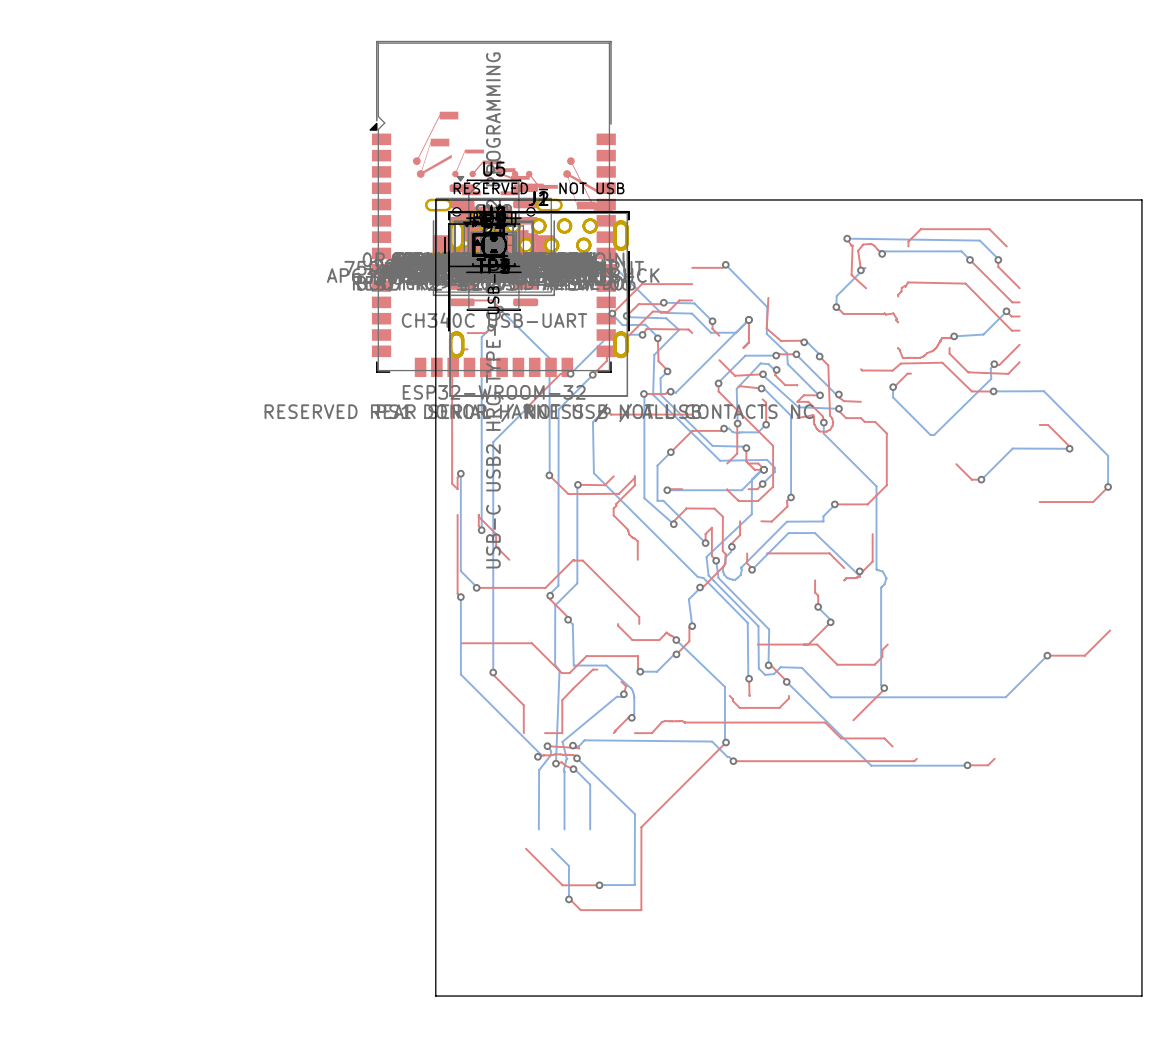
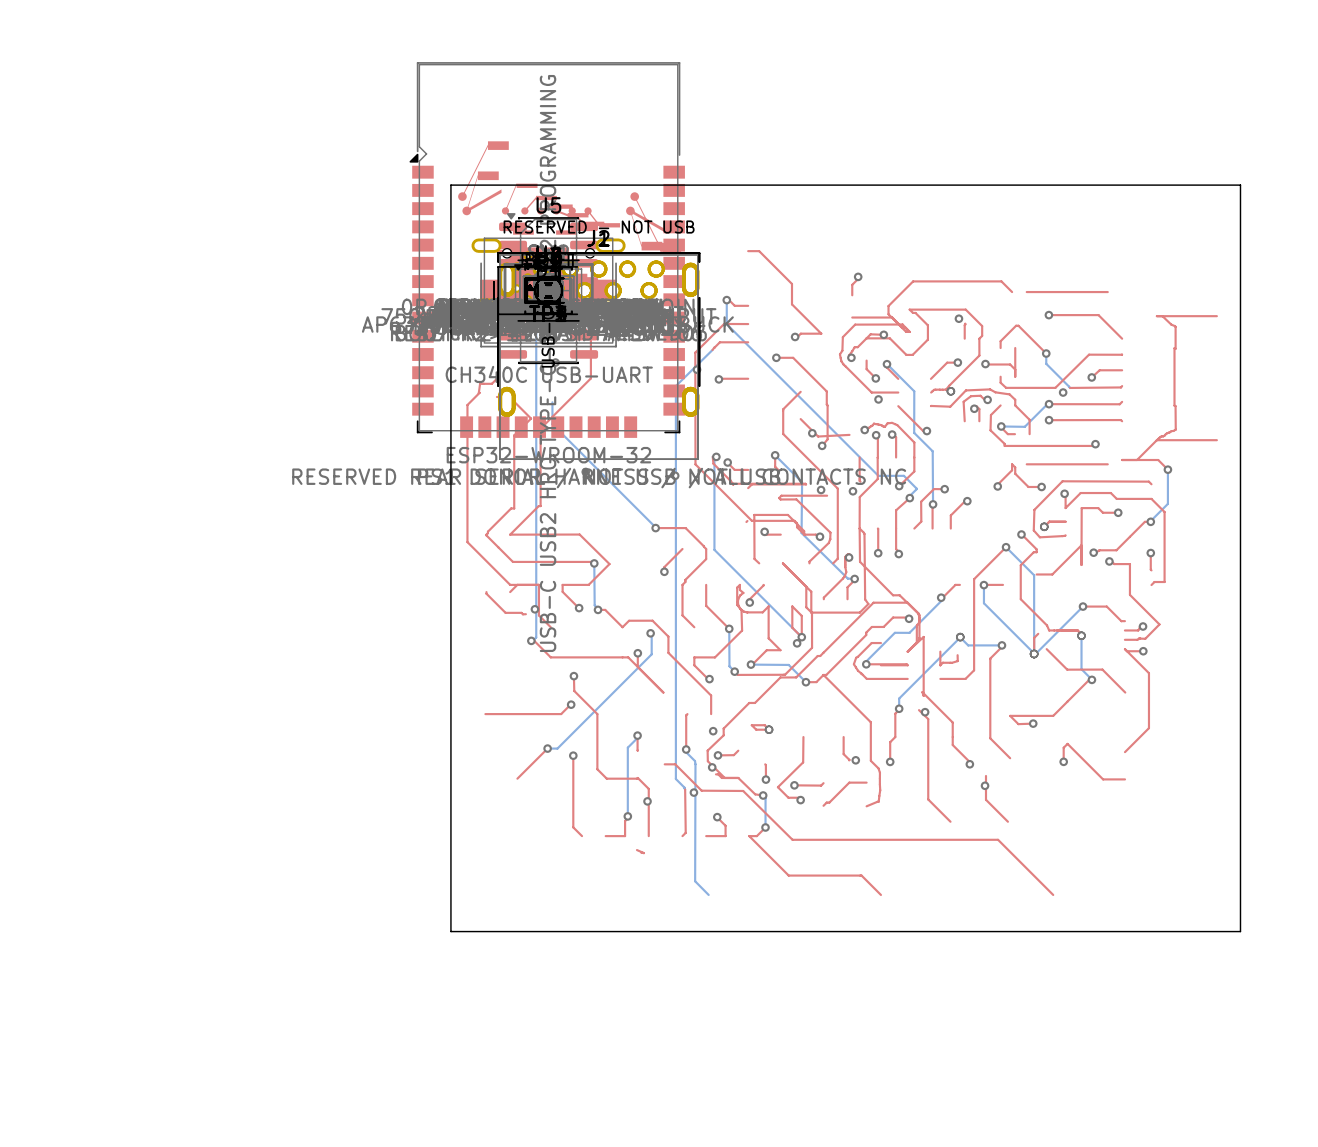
board edge: (435, 199) (1141, 199) (1141, 996) (435, 996) (435, 199) -> (450, 185) (450, 931) (1240, 931) (1240, 185) (450, 185)
top track: none -> (496, 251) (517, 251) (583, 316) (583, 326) (590, 334) (590, 378) (540, 428) (540, 506) (510, 534) (579, 534) (609, 564) (588, 584) (562, 584) (562, 591) (578, 607)
top track: none -> (748, 251) (759, 251) (792, 283) (792, 304) (821, 333) (800, 333) (795, 336)
top track: none -> (858, 276) (852, 284) (852, 295)
via: none -> (858, 276)
bottom track: none -> (520, 277) (536, 293) (536, 637) (531, 640)
top track: (847, 238) (852, 245) (851, 275) (866, 288) -> (965, 323) (964, 338)
bottom track: (847, 238) (979, 240) (998, 259) -> none
via: (847, 238) -> none
top track: (908, 246) (908, 241) (920, 229) (989, 229) (1006, 246) -> (1012, 292) (1001, 281) (913, 281) (888, 306) (888, 314) (906, 331) (909, 331)
top track: none -> (1026, 292) (1107, 292)
bottom track: (528, 253) (600, 253) (660, 312) (692, 313) (711, 332) (736, 332) (748, 319) -> none
top track: none -> (726, 300) (734, 305) (748, 305)
bottom track: none -> (726, 300) (726, 324) (878, 475) (903, 475) (916, 488) (909, 498)
via: none -> (726, 300)
top track: (882, 253) (871, 243) (863, 244) (858, 250) (860, 270) -> none
bottom track: (882, 253) (879, 251) (961, 251) (969, 259) -> none
via: (882, 253) -> none
top track: (969, 259) (1012, 302) (1019, 302) -> none
via: (969, 259) -> none
top track: (998, 259) (998, 266) (1019, 288) -> none
via: (998, 259) -> none
top track: (725, 264) (722, 267) (692, 267) -> none
bottom track: (725, 264) (767, 307) (766, 333) (787, 353) (787, 364) -> none
via: (725, 264) -> none
top track: none -> (1048, 315) (1098, 315) (1122, 338)
via: none -> (1048, 315)
top track: none -> (1156, 316) (1216, 316)
top track: none -> (1162, 316) (1175, 326) (1175, 429) (1156, 440)
top track: none -> (852, 317) (892, 317) (909, 331)
bottom track: (860, 270) (865, 268) (836, 296) (836, 307) -> none
top track: none -> (748, 324) (724, 323) (695, 352) (695, 464) (751, 520) (794, 520) (797, 527) (804, 534) (815, 534) (819, 538) (819, 536)
top track: none -> (909, 331) (902, 324) (855, 324) (842, 337) (842, 350) (839, 354) (843, 364) (871, 392) (898, 392)
top track: (692, 284) (641, 284) (613, 312) -> none
top track: none -> (883, 334) (870, 334) (857, 347) (854, 347) (849, 355) (851, 357)
via: none -> (883, 334)
via: none -> (795, 336)
top track: none -> (866, 338) (889, 338) (906, 354) (912, 354) (927, 339) (927, 325) (909, 309) (965, 309) (982, 326) (982, 335) (979, 338) (979, 355) (946, 389) (934, 389) (931, 392)
top track: none -> (748, 342) (719, 342) (714, 347)
top track: (898, 294) (901, 287) (905, 286) (907, 282) (965, 283) (1011, 330) (1019, 330) -> (1000, 346) (1000, 341) (1016, 325) (1018, 325) (1046, 353)
top track: none -> (714, 347) (712, 349)
top track: none -> (1015, 348) (1015, 376)
top track: (768, 297) (766, 328) (780, 340) (804, 342) -> none
bottom track: none -> (712, 349) (675, 386) (675, 779) (685, 789)
top track: (467, 300) (491, 300) (500, 309) -> none
top track: (692, 300) (679, 300) (668, 312) (652, 311) (606, 357) (606, 360) (592, 374) -> none
bottom track: none -> (1046, 353) (1046, 363) (1070, 387)
via: none -> (1046, 353)
top track: (663, 302) (638, 304) (626, 315) -> none
bottom track: (663, 302) (694, 303) (712, 321) -> none
via: (663, 302) -> none
top track: none -> (776, 357) (793, 357) (826, 391) (827, 439) (822, 445)
via: none -> (776, 357)
via: none -> (851, 357)
top track: none -> (866, 360) (866, 369) (875, 378)
top track: (836, 307) (843, 313) (893, 313) (898, 322) -> (1122, 354) (1089, 354) (1055, 387) (1006, 387) (1000, 382) (1000, 376)
via: (836, 307) -> none
bottom track: (500, 309) (549, 358) (549, 474) -> none
top track: none -> (957, 362) (947, 362) (930, 378)
via: none -> (957, 362)
top track: none -> (985, 364) (1010, 364) (1015, 369)
via: none -> (985, 364)
top track: none -> (886, 364) (886, 367) (898, 378)
bottom track: none -> (886, 364) (914, 391) (914, 432) (932, 451) (933, 504)
via: none -> (886, 364)
top track: (1006, 311) (1011, 316) (1019, 316) -> none
bottom track: (1006, 311) (983, 334) (954, 336) -> none
via: (1006, 311) -> none
bottom track: (612, 313) (622, 325) (645, 324) (656, 336) -> none
via: (612, 313) -> none
top track: none -> (1122, 370) (1099, 370) (1091, 377)
bottom track: (626, 317) (666, 318) (679, 329) (654, 354) (653, 394) (720, 460) (767, 459) (774, 467) (774, 471) (762, 484) -> none
top track: (748, 319) (748, 342) (743, 347) -> none
via: (748, 319) -> none
bottom track: (747, 320) (675, 392) (670, 391) -> none
top track: (712, 321) (712, 328) (719, 335) -> none
via: (712, 321) -> none
via: none -> (1091, 377)
via: none -> (875, 378)
top track: none -> (496, 378) (491, 383) (480, 383) (479, 392) (467, 405) (467, 542) (510, 584) (538, 584) (538, 615) (550, 627)
via: none -> (718, 379)
top track: none -> (748, 378) (718, 379)
top track: (490, 327) (485, 333) (467, 333) -> none
bottom track: (490, 327) (481, 337) (481, 530) -> none
via: (490, 327) -> none
top track: none -> (1122, 386) (1070, 387)
top track: (692, 333) (688, 329) (646, 329) (642, 334) -> none
bottom track: (642, 334) (609, 334) (570, 373) -> none
via: (642, 334) -> none
via: none -> (950, 391)
top track: (954, 336) (956, 338) (941, 338) -> none
top track: (657, 338) (658, 361) (667, 371) -> none
via: (657, 338) -> none
top track: (942, 338) (940, 341) -> none
top track: none -> (496, 396) (509, 396) (531, 418) (514, 435) (514, 508) (511, 508) (486, 535) (512, 561) (594, 563)
via: none -> (878, 399)
bottom track: (804, 342) (808, 342) (819, 356) -> none
via: (804, 342) -> none
top track: none -> (987, 399) (980, 395) (971, 396) (963, 401) (964, 421)
via: none -> (987, 399)
top track: (939, 342) (932, 351) (920, 357) (902, 358) (898, 347) -> (1095, 444) (1093, 445) (1004, 445) (990, 430) (990, 415) (1000, 405)
top track: none -> (1122, 401) (1119, 404) (1049, 404)
top track: (1019, 344) (999, 365) (994, 364) -> none
bottom track: none -> (552, 402) (552, 424) (655, 528)
bottom track: none -> (1049, 404) (1024, 426) (1001, 426)
via: none -> (1049, 404)
top track: (949, 347) (949, 353) (968, 372) (1008, 373) (1019, 362) -> none
top track: none -> (898, 406) (923, 431) (926, 431)
top track: none -> (930, 406) (950, 406) (965, 390) (990, 389) (995, 392) (1009, 394) (1015, 399) (1015, 405) (1029, 419) (1029, 434)
top track: (467, 349) (460, 349) (452, 353) (451, 365) (452, 483) (457, 489) (457, 477) (460, 473) -> none
top track: none -> (974, 408) (976, 406) (979, 409) (979, 421)
via: none -> (974, 408)
top track: (796, 354) (776, 355) -> none
bottom track: (796, 354) (839, 397) (838, 394) -> none
via: (796, 354) -> none
bottom track: (776, 355) (745, 355) (718, 383) -> none
via: (776, 355) -> none
top track: (819, 356) (828, 365) (830, 415) (833, 422) (832, 425) (826, 431) (819, 431) (814, 424) (813, 415) (797, 418) -> none
via: (819, 356) -> none
top track: none -> (1049, 420) (1122, 421)
via: none -> (1049, 420)
bottom track: (787, 364) (820, 395) -> none
bottom track: (994, 364) (990, 368) (991, 378) (934, 435) (930, 435) (893, 397) (893, 387) -> none
via: (994, 364) -> none
via: none -> (1001, 426)
top track: none -> (861, 428) (868, 428) (873, 423) (884, 426) (887, 423) (892, 422) (897, 425) (914, 442) (914, 471) (899, 486)
top track: (776, 369) (775, 375) (785, 385) (797, 385) -> none
bottom track: (776, 369) (768, 364) (760, 363) (736, 388) (737, 423) -> none
top track: (860, 369) (892, 370) (900, 363) (942, 362) (971, 391) (993, 391) -> none
via: none -> (926, 431)
bottom track: (667, 371) (660, 378) (660, 394) (712, 445) (746, 448) -> none
via: (667, 371) -> none
via: none -> (812, 433)
top track: (570, 373) (560, 373) (527, 407) -> none
via: (570, 373) -> none
top track: none -> (892, 433) (896, 437) (896, 457)
top track: (907, 373) (893, 387) -> (1011, 434) (1007, 434) (1002, 429)
bottom track: (592, 374) (558, 409) (558, 585) (550, 595) -> none
via: (592, 374) -> none
bottom track: (763, 374) (798, 407) (838, 408) -> none
via: (763, 374) -> none
top track: none -> (876, 435) (876, 433) (877, 457)
via: none -> (876, 435)
via: none -> (892, 434)
top track: none -> (1156, 440) (1216, 440)
top track: none -> (1156, 440) (1137, 460)
via: none -> (1095, 444)
top track: (718, 383) (718, 391) (773, 445) (773, 486) (758, 500) (738, 501) (727, 489) -> (827, 495) (781, 495) (779, 498) (796, 499) (830, 532) (828, 542) (809, 563)
via: (718, 383) -> none
via: none -> (822, 445)
top track: (738, 387) (761, 388) -> none
via: (893, 387) -> none
bottom track: (761, 388) (761, 386) (791, 415) (791, 497) -> none
via: (761, 388) -> none
top track: (670, 391) (665, 393) (643, 393) -> none
via: (670, 391) -> none
bottom track: (993, 391) (1043, 391) (1108, 455) (1108, 487) -> none
via: (993, 391) -> none
top track: none -> (775, 455) (775, 466) (779, 470)
bottom track: none -> (775, 455) (802, 482) (801, 533) (847, 578) (854, 578)
via: none -> (775, 455)
top track: none -> (712, 456) (713, 463) (733, 484) (733, 483) (806, 484) (751, 484) (748, 488)
bottom track: none -> (712, 456) (714, 458) (714, 549) (801, 637)
bottom track: (643, 393) (644, 498) (673, 524) -> none
top track: none -> (859, 457) (860, 481)
top track: none -> (877, 457) (877, 479) (859, 497) (859, 528)
top track: (838, 394) (839, 398) (844, 401) (860, 401) -> none
via: (838, 394) -> none
top track: (820, 395) (803, 395) (797, 401) (808, 401) (823, 416) (823, 424) (823, 422) -> none
via: (820, 395) -> none
top track: none -> (1122, 460) (1158, 460) (1167, 469)
top track: none -> (727, 462) (734, 469) (748, 469)
via: none -> (727, 462)
top track: (762, 399) (766, 402) (766, 424) -> none
top track: none -> (1026, 464) (1107, 464)
bottom track: none -> (1167, 469) (1167, 503) (1150, 521)
via: none -> (1167, 469)
bottom track: (527, 407) (493, 442) (493, 672) -> none
top track: (838, 408) (846, 418) (860, 418) (864, 421) (875, 421) (886, 433) (886, 485) (867, 504) (834, 504) -> none
via: (838, 408) -> none
top track: (607, 410) (611, 414) (692, 414) -> none
bottom track: (607, 410) (604, 410) (592, 422) (593, 473) (697, 576) (703, 578) (747, 622) (749, 678) -> none
via: none -> (899, 486)
top track: none -> (997, 486) (1012, 470) (1012, 464) (1015, 467) (1015, 473) (1028, 486) (1041, 486)
via: none -> (997, 486)
via: none -> (1041, 486)
bottom track: (823, 422) (823, 433) (876, 486) (876, 569) (882, 571) (886, 578) (882, 586) -> none
via: (823, 422) -> none
top track: none -> (944, 489) (933, 489) (921, 501) (921, 521) (914, 528)
via: none -> (944, 489)
top track: (737, 423) (737, 453) (727, 463) -> none
bottom track: (766, 424) (758, 432) (736, 432) (729, 428) (724, 428) -> none
top track: (1039, 425) (1048, 425) (1069, 446) (1069, 448) -> none
top track: none -> (1064, 493) (1065, 508) (1080, 493) (1110, 493) (1116, 498) (1151, 498) (1164, 512) (1164, 582) (1154, 582) (1151, 585)
via: none -> (1064, 493)
top track: (724, 428) (720, 430) (692, 430) (671, 451) -> none
via: (724, 428) -> none
top track: none -> (909, 498) (896, 510) (896, 549) (898, 554)
via: none -> (909, 498)
top track: none -> (967, 501) (950, 515) (950, 528)
via: none -> (967, 501)
top track: none -> (933, 504) (932, 528)
via: none -> (933, 504)
top track: none -> (1118, 512) (1102, 512) (1098, 508) (1081, 508) (1081, 564) (1081, 545) (1052, 574) (1036, 574)
via: none -> (1118, 512)
top track: (746, 448) (746, 461) (754, 469) (763, 469) (758, 463) (748, 463) -> none
via: (746, 448) -> none
bottom track: (1069, 448) (1012, 448) (982, 478) -> none
via: (1069, 448) -> none
top track: none -> (1065, 521) (1049, 521) (1044, 526)
bottom track: (670, 452) (657, 465) (657, 500) (663, 500) (705, 543) -> none
via: (670, 452) -> none
top track: none -> (1150, 521) (1144, 521) (1116, 550) (1099, 550) (1096, 552)
via: none -> (1150, 521)
via: none -> (1044, 526)
top track: none -> (655, 528) (685, 528) (706, 549)
via: none -> (655, 528)
top track: none -> (859, 528) (864, 533) (865, 599) (868, 604) (859, 612) (811, 612) (811, 591) (782, 563)
top track: none -> (859, 528) (860, 561) (893, 595) (899, 595) (919, 615) (919, 639) (907, 651) (923, 636) (923, 695) (922, 692) (952, 722) (952, 745) (971, 763) (969, 764)
top track: none -> (877, 528) (878, 553)
top track: none -> (764, 532) (766, 534) (780, 534)
via: none -> (764, 531)
top track: none -> (1021, 534) (1036, 549) (1036, 552) (1033, 552) (1020, 565) (1020, 599) (1047, 625) (1049, 630) (1077, 630) (1080, 634)
via: none -> (1021, 534)
top track: (956, 464) (971, 479) (981, 479) -> (1065, 535) (1039, 537) (1033, 530) (1034, 509) (1062, 481) (1148, 481) (1151, 484)
via: none -> (819, 536)
via: (763, 469) -> none
bottom track: (460, 473) (460, 571) (476, 587) -> none
via: (460, 473) -> none
top track: none -> (1006, 547) (974, 579) (974, 670) (965, 678) (940, 678)
bottom track: none -> (1006, 547) (1034, 575) (1034, 653)
via: none -> (1006, 547)
top track: (549, 475) (568, 494) (618, 493) (634, 477) -> none
via position: (549, 475) -> (594, 563)
top track: none -> (1150, 553) (1151, 570)
via: none -> (1150, 553)
via: none -> (878, 553)
via: none -> (898, 554)
top track: (577, 484) (604, 485) -> (664, 571) (664, 567) (672, 558)
bottom track: (577, 484) (577, 583) (555, 605) (555, 664) (559, 670) (555, 763) -> none
via: (577, 484) -> none
top track: (762, 484) (762, 482) (757, 489) (748, 489) -> (800, 391) (783, 409) (783, 434) (837, 488) (837, 558) (833, 563)
top track: none -> (1110, 559) (1114, 564) (1129, 564) (1129, 594) (1159, 624) (1145, 638) (1124, 639)
via: none -> (1109, 561)
top track: (1108, 487) (1093, 502) (1039, 502) -> none
via: (1108, 487) -> none
bottom track: none -> (594, 563) (594, 605) (598, 609)
top track: (682, 489) (667, 490) -> (759, 563) (754, 558) (754, 514) (787, 514) (804, 531) (804, 534)
bottom track: (667, 490) (741, 490) (763, 468) (763, 469) (761, 469) (751, 479) (751, 514) (706, 556) (708, 575) (758, 626) (758, 668) (765, 674) (773, 674) (780, 667) (801, 667) (830, 697) (1005, 697) (1046, 656) -> none
via: (667, 490) -> none
via: none -> (664, 571)
top track: (791, 497) (786, 501) (787, 506) (771, 521) (761, 521) -> (854, 578) (847, 587) (847, 599)
via: (791, 497) -> none
via: none -> (854, 578)
bottom track: (834, 504) (823, 516) (823, 521) (786, 521) (741, 567) -> none
via: (834, 504) -> none
top track: none -> (517, 584) (510, 592)
top track: none -> (706, 584) (706, 605) (729, 628)
top track: (686, 508) (714, 508) (722, 516) (722, 551) (725, 554) (725, 564) (704, 586) (700, 587) -> none
top track: none -> (959, 584) (955, 584) (941, 597)
bottom track: none -> (983, 585) (983, 603) (1034, 653)
via: none -> (983, 585)
top track: none -> (1002, 584) (983, 585)
top track: none -> (806, 586) (806, 607) (812, 612) (812, 647) (785, 674) (737, 674) (734, 671)
top track: none -> (486, 592) (505, 612) (525, 614)
top track: (457, 514) (457, 593) (460, 597) -> none
top track: (478, 514) (478, 526) (481, 530) -> none
top track: (613, 515) (627, 529) (629, 534) (637, 541) (637, 559) -> (682, 592) (682, 615) (694, 627)
top track: (478, 516) (496, 534) (496, 546) (509, 559) -> none
bottom track: none -> (941, 597) (941, 601) (909, 632) (894, 632) (864, 663)
via: none -> (941, 597)
top track: (740, 521) (740, 535) (730, 544) (731, 546) -> (823, 599) (844, 576) (846, 572) (845, 557) (849, 554)
top track: (711, 527) (705, 534) (705, 543) -> (792, 606) (801, 615) (801, 637) (792, 627)
top track: none -> (1083, 606) (1106, 606) (1121, 621) (1124, 621)
bottom track: none -> (1083, 606) (1034, 653)
via: none -> (1083, 606)
via: none -> (579, 608)
via: none -> (598, 609)
top track: none -> (747, 612) (743, 611) (740, 609) (738, 605) (738, 599) (743, 592) (739, 590) (739, 584) (737, 587) (737, 604) (741, 609) (742, 630) (714, 657) (694, 657) (694, 665) (709, 679)
top track: none -> (747, 612) (762, 612) (768, 606) (768, 638) (780, 650) (766, 650) (750, 664)
top track: (872, 534) (872, 561) (859, 576) (846, 578) (844, 580) -> none
top track: none -> (909, 618) (893, 617) (883, 626) (871, 626) (826, 674) (823, 674)
via: none -> (909, 618)
via: (705, 543) -> none
top track: none -> (1143, 626) (1139, 626) (1138, 630) (1124, 630)
via: none -> (1143, 626)
top track: (711, 546) (711, 556) (716, 560) -> none
bottom track: (731, 546) (731, 551) (725, 557) (722, 568) (724, 574) (727, 577) (735, 579) (740, 575) (741, 567) -> none
via: (731, 546) -> none
bottom track: none -> (729, 628) (729, 666) (733, 670)
via: none -> (729, 628)
bottom track: none -> (650, 633) (651, 654) (557, 748) (547, 748)
via: none -> (650, 633)
top track: none -> (1038, 633) (1034, 637)
top track: (747, 553) (747, 563) (752, 569) -> none
top track: (767, 553) (829, 553) (844, 568) -> (942, 662) (940, 665) (940, 651)
bottom track: none -> (1081, 635) (1081, 669) (1090, 678)
via: none -> (1081, 635)
via: none -> (801, 637)
bottom track: none -> (960, 637) (968, 645) (1001, 645)
bottom track: none -> (960, 637) (899, 698) (899, 708)
top track: none -> (1034, 637) (1034, 653)
top track: none -> (531, 640) (534, 640) (550, 657) (628, 657) (663, 692)
via: none -> (531, 640)
top track: none -> (916, 642) (916, 625) (919, 619) (918, 613) (907, 602) (873, 602) (796, 677) (780, 677) (754, 702) (749, 702) (723, 728) (723, 735) (707, 750) (707, 761) (724, 777)
bottom track: (716, 560) (718, 577) (769, 629) (768, 665) -> none
top track: none -> (880, 643) (871, 643) (856, 657) (853, 664) (857, 670) (866, 678) (907, 678)
via: none -> (1001, 645)
top track: none -> (1002, 646) (990, 658) (990, 738) (1010, 758)
top track: none -> (1046, 649) (1067, 669) (1102, 669) (1125, 692)
top track: none -> (1124, 649) (1148, 673) (1148, 728) (1125, 752)
top track: none -> (1127, 651) (1143, 651)
via: none -> (1143, 651)
top track: none -> (637, 653) (637, 666)
via: none -> (637, 653)
bottom track: (752, 569) (788, 533) (814, 533) (858, 574) (859, 571) -> none
via: (752, 569) -> none
via: none -> (1034, 653)
via position: (859, 571) -> (960, 637)
bottom track: none -> (750, 664) (788, 664) (805, 682)
via: none -> (750, 664)
top track: none -> (866, 664) (907, 665) (880, 665)
via: none -> (866, 664)
top track: (815, 580) (818, 606) -> none
via: none -> (734, 671)
bottom track: (882, 586) (881, 685) (884, 688) -> none
top track: (476, 587) (545, 587) (573, 559) (582, 560) (639, 617) -> (598, 609) (605, 609) (622, 627) (629, 620) (652, 620) (668, 636) (668, 652) (711, 695) (711, 706)
via: (476, 587) -> none
bottom track: (700, 587) (688, 599) (692, 626) -> none
via: (700, 587) -> none
top track: none -> (823, 674) (870, 722) (870, 760) (879, 772) (880, 790) (878, 801) (866, 806)
top track: none -> (823, 674) (816, 682) (805, 682)
top track: none -> (573, 676) (574, 690) (597, 714) (597, 769) (606, 778) (637, 777) (648, 788) (648, 836)
via: none -> (573, 676)
via: none -> (709, 679)
top track: none -> (1091, 679) (1089, 679) (1053, 715) (1010, 715) (1018, 724) (1033, 723)
via: none -> (1091, 679)
top track: (550, 595) (550, 599) (567, 617) (567, 619) -> none
via: (550, 595) -> none
via: none -> (805, 682)
bottom track: (460, 597) (460, 674) (541, 755) (537, 756) -> none
via: (460, 597) -> none
bottom track: (818, 606) (830, 622) -> none
via position: (818, 606) -> (899, 708)
top track: none -> (571, 704) (561, 714) (485, 714)
via: none -> (571, 704)
bottom track: (568, 619) (572, 624) (573, 665) (606, 665) (631, 688) (634, 697) -> none
via position: (568, 619) -> (637, 735)
top track: none -> (899, 708) (895, 713) (895, 737) (890, 742) (890, 761)
top track: (830, 622) (808, 644) -> none
top track: (618, 624) (632, 640) (659, 640) (666, 632) (676, 640) -> (687, 714) (686, 749)
top track: (692, 626) (689, 627) (689, 641) (676, 654) -> none
via: (692, 626) -> none
top track: (1110, 630) (1084, 655) (1047, 655) -> none
via: none -> (1033, 723)
top track: none -> (768, 728) (764, 725) (751, 725) (756, 729) (768, 728)
via: none -> (769, 729)
via: none -> (713, 731)
bottom track: (676, 640) (725, 686) (725, 742) -> none
via: (676, 640) -> none
top track: (461, 643) (531, 643) (561, 673) (569, 673) (586, 656) (638, 656) (638, 668) (640, 671) -> none
top track: none -> (637, 735) (637, 750)
bottom track: none -> (637, 735) (627, 747) (627, 816)
top track: none -> (803, 737) (803, 762) (777, 787) (788, 797) (798, 797) (800, 800)
top track: (757, 644) (817, 644) (837, 664) (874, 664) (882, 657) (882, 650) (887, 644) -> (843, 737) (843, 754) (849, 760)
top track: none -> (547, 748) (517, 778)
via: none -> (547, 748)
bottom track: (676, 654) (675, 652) (657, 671) (640, 671) -> none
via: (676, 654) -> none
bottom track: none -> (686, 749) (684, 750) (695, 761) (695, 764) (695, 881) (708, 894)
via: none -> (686, 749)
via: (1047, 655) -> none
top track: none -> (738, 750) (733, 755) (717, 755)
via: none -> (717, 755)
via: none -> (573, 755)
top track: (768, 665) (770, 665) (786, 681) -> none
top track: none -> (1063, 761) (1063, 747) (1067, 743) (1103, 779) (1125, 779)
via: none -> (1063, 761)
top track: none -> (664, 764) (675, 764) (701, 790) (743, 790) (792, 839) (998, 839) (1053, 894)
top track: none -> (765, 764) (765, 779)
via: none -> (969, 764)
top track: (597, 669) (592, 669) (562, 700) (562, 733) -> (627, 816) (625, 821) (625, 836)
top track: (493, 672) (493, 675) (523, 705) (523, 733) -> (573, 755) (573, 827) (582, 836)
via: (493, 672) -> none
top track: none -> (716, 774) (721, 777) (738, 777) (755, 794) (763, 795)
top track: (749, 678) (749, 695) -> none
via: (749, 678) -> none
top track: none -> (986, 775) (986, 799) (1007, 821)
top track: (621, 681) (625, 686) (623, 694) -> none
bottom track: (786, 681) (871, 765) (967, 765) -> none
via position: (786, 681) -> (890, 761)
via: none -> (765, 779)
top track: none -> (823, 783) (821, 785) (794, 785)
top track: none -> (866, 782) (849, 782) (829, 802) (823, 805)
via: none -> (794, 785)
top track: (884, 688) (853, 720) -> (919, 710) (928, 719) (928, 799) (950, 821)
bottom track: (623, 694) (624, 696) (622, 697) (616, 696) (562, 741) (567, 758) (563, 770) (564, 829) -> none
top track: (729, 695) (739, 707) (779, 707) (788, 698) (788, 695) -> none
bottom track: none -> (763, 795) (765, 798) (765, 827)
via: none -> (763, 795)
bottom track: (634, 697) (634, 714) (631, 717) -> none
via: none -> (800, 800)
via: none -> (647, 801)
via: none -> (627, 816)
top track: (631, 717) (628, 717) (615, 731) -> (685, 789) (684, 834)
via position: (631, 717) -> (717, 817)
top track: none -> (765, 827) (756, 836) (749, 836) (788, 875) (861, 875) (880, 894)
via: none -> (765, 827)
top track: (652, 732) (662, 721) (665, 720) (825, 722) (841, 738) (884, 738) (892, 746) -> (725, 835) (725, 825) (717, 817)
top track: (726, 742) (641, 827) (641, 910) (580, 910) (568, 899) -> none
via: (726, 742) -> none
bottom track: (572, 745) (578, 746) (584, 740) (712, 741) (733, 761) -> none
via: (572, 745) -> none
top track: (547, 746) (576, 747) -> none
bottom track: (547, 746) (551, 750) (550, 755) (539, 770) (538, 829) -> none
via: (547, 746) -> none
top track: (537, 756) (560, 754) (577, 756) (577, 758) -> none
via: (537, 756) -> none
bottom track: (577, 758) (634, 814) (634, 885) (599, 885) -> none
via: (577, 758) -> none
top track: (916, 758) (914, 761) (733, 761) -> none
top track: (994, 758) (988, 765) (967, 765) -> none
via: (733, 761) -> none
top track: (555, 763) (561, 762) (573, 769) -> none
via: (555, 763) -> none
via: (967, 765) -> none
bottom track: (573, 769) (572, 766) (590, 784) (590, 829) -> none
via: (573, 769) -> none
top track: (525, 848) (562, 885) (599, 885) -> none
bottom track: (551, 848) (568, 865) (568, 899) -> none
via: (599, 885) -> none
via: (568, 899) -> none

